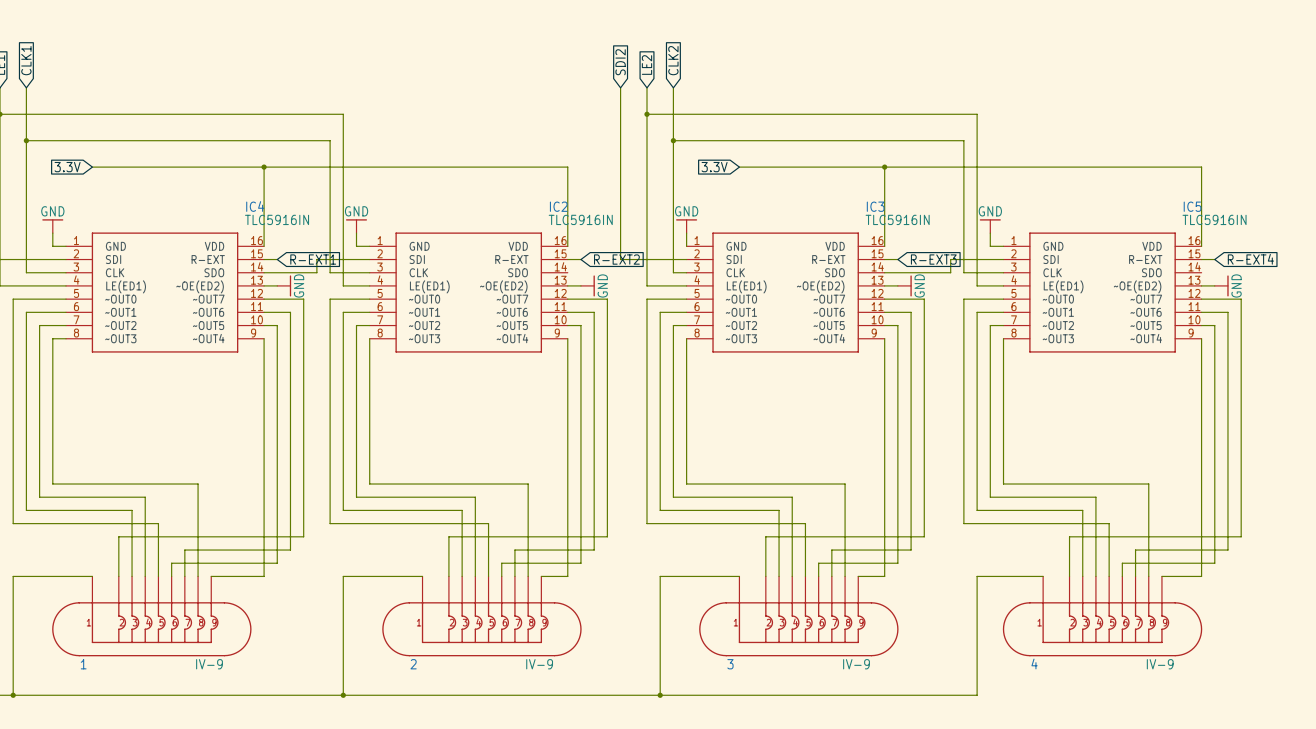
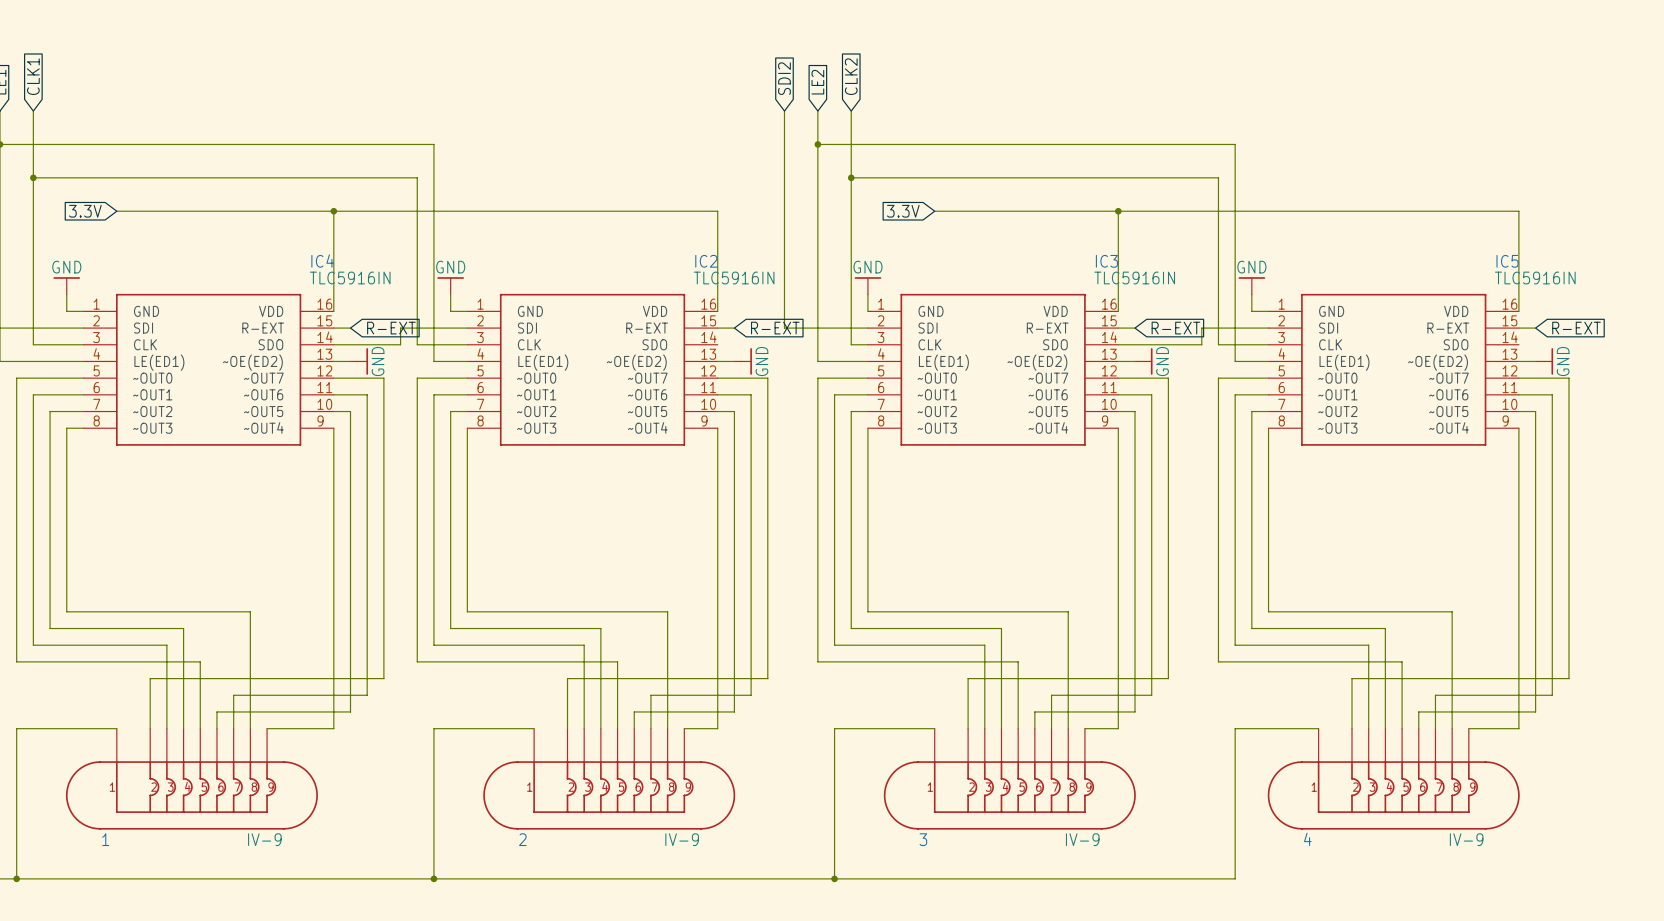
global label: R-EXT1 (313, 259) -> R-EXT (391, 328)
global label: R-EXT2 (616, 259) -> R-EXT (775, 328)
global label: R-EXT3 (933, 259) -> R-EXT (1175, 328)
global label: R-EXT4 (1250, 259) -> R-EXT (1576, 328)

